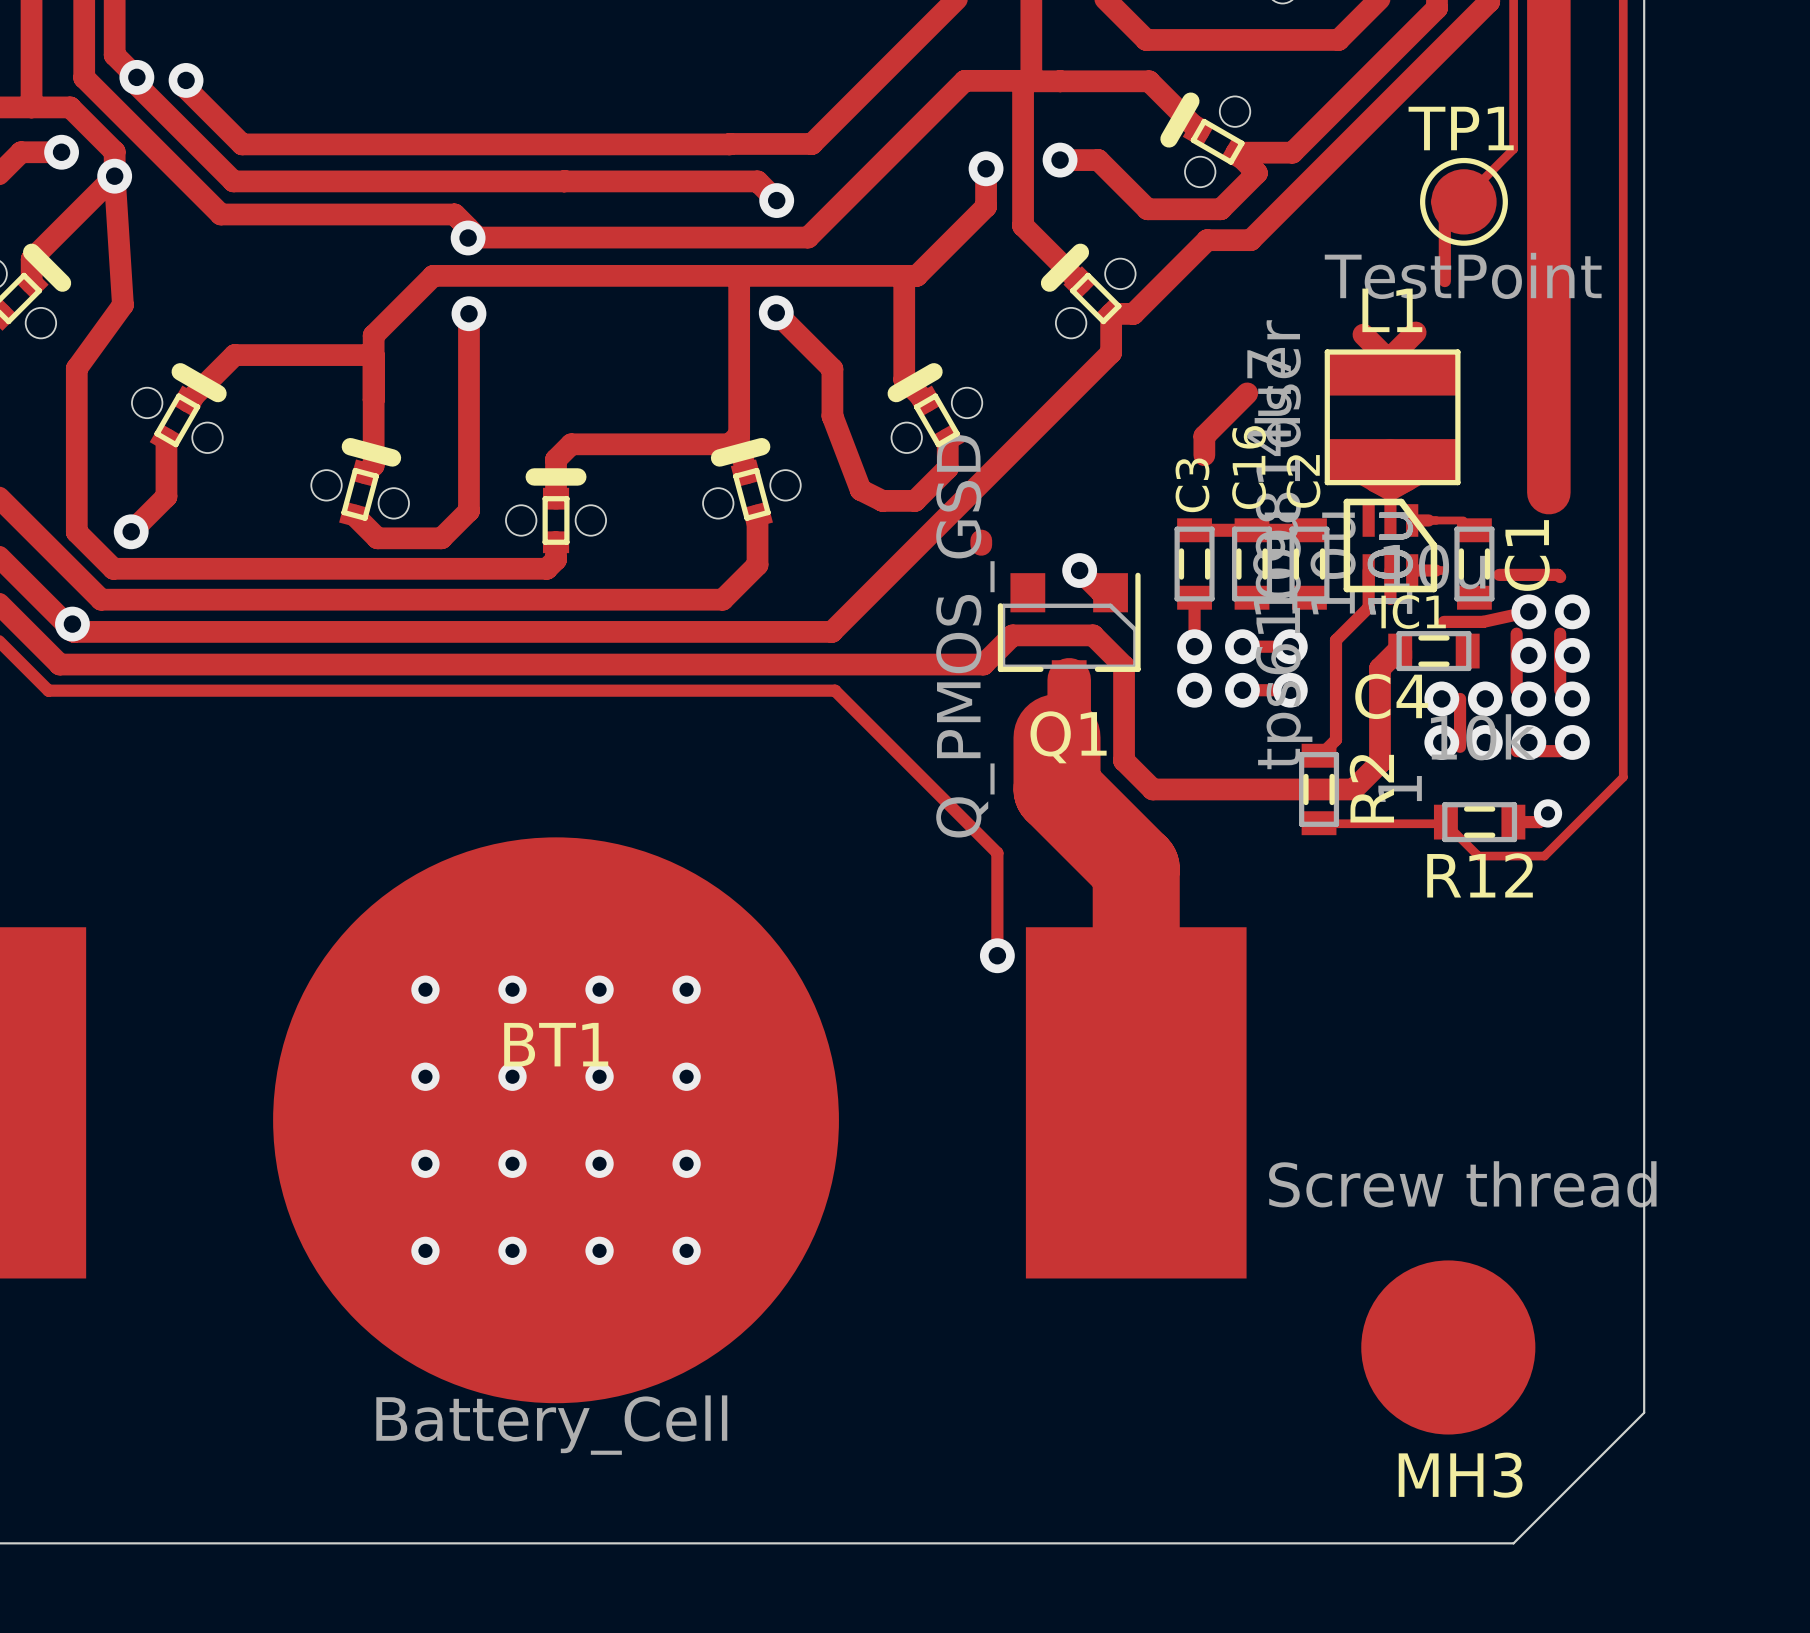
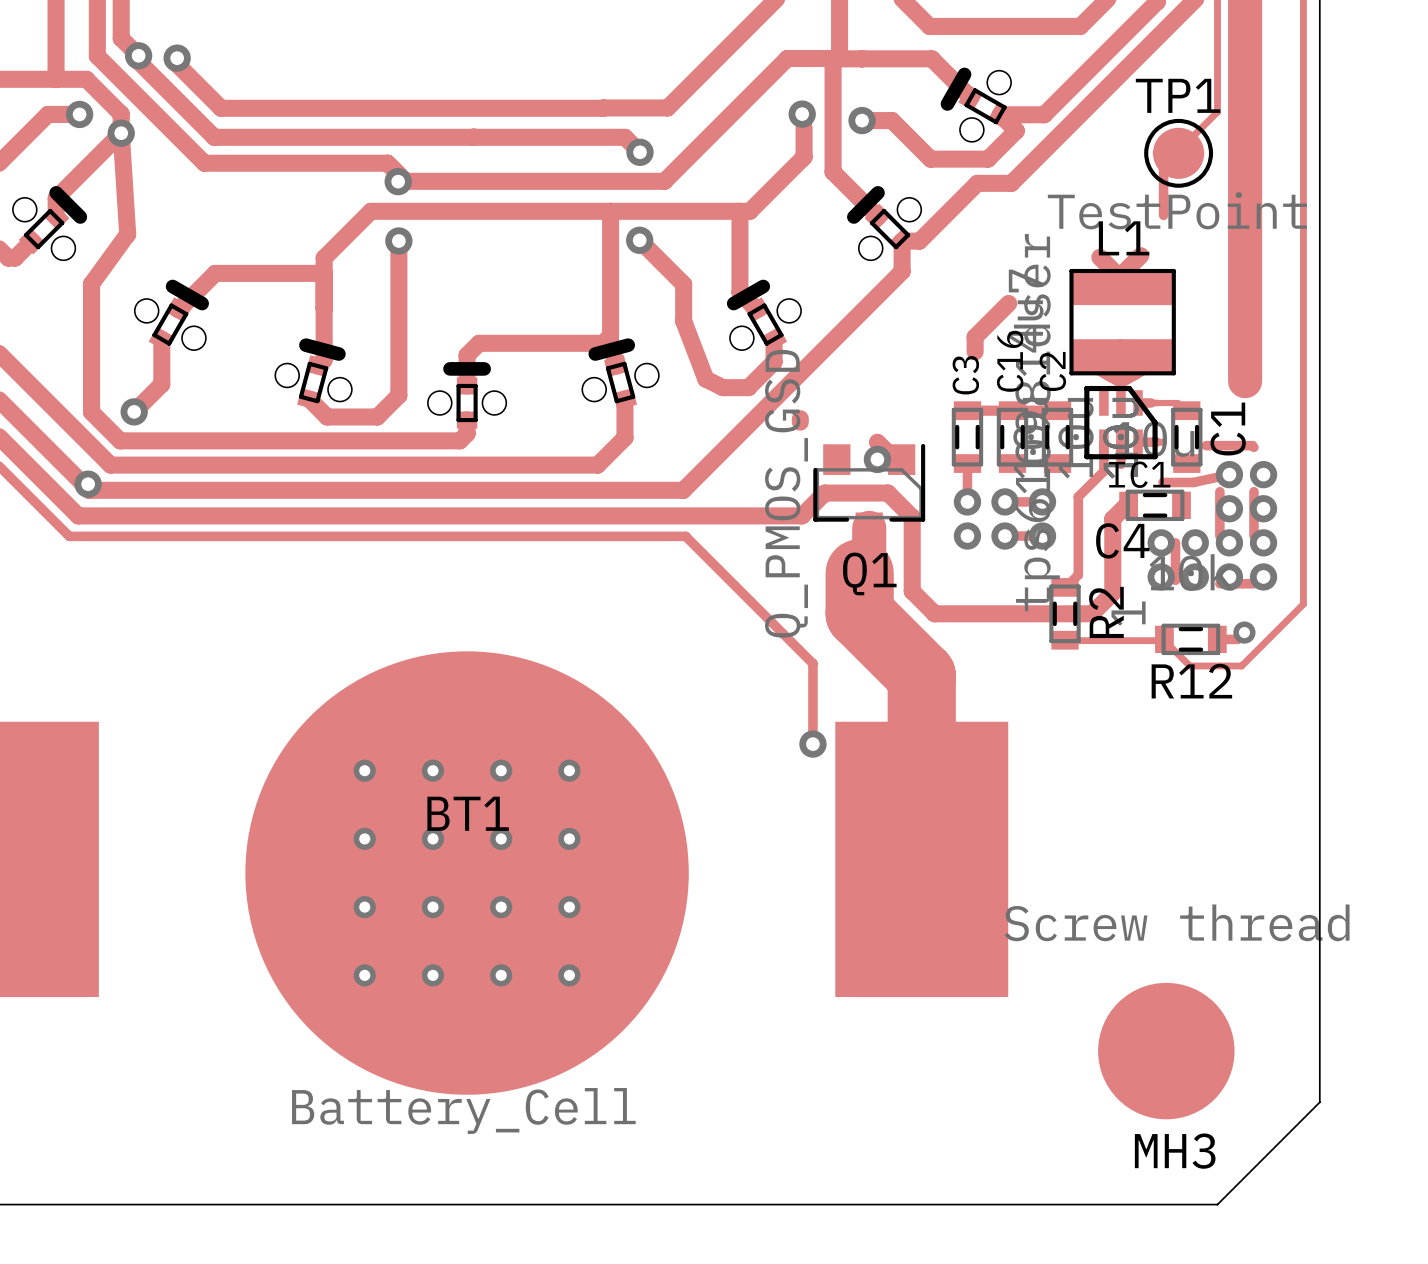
via position: (986, 168) -> (802, 114)
via position: (1079, 570) -> (877, 459)

